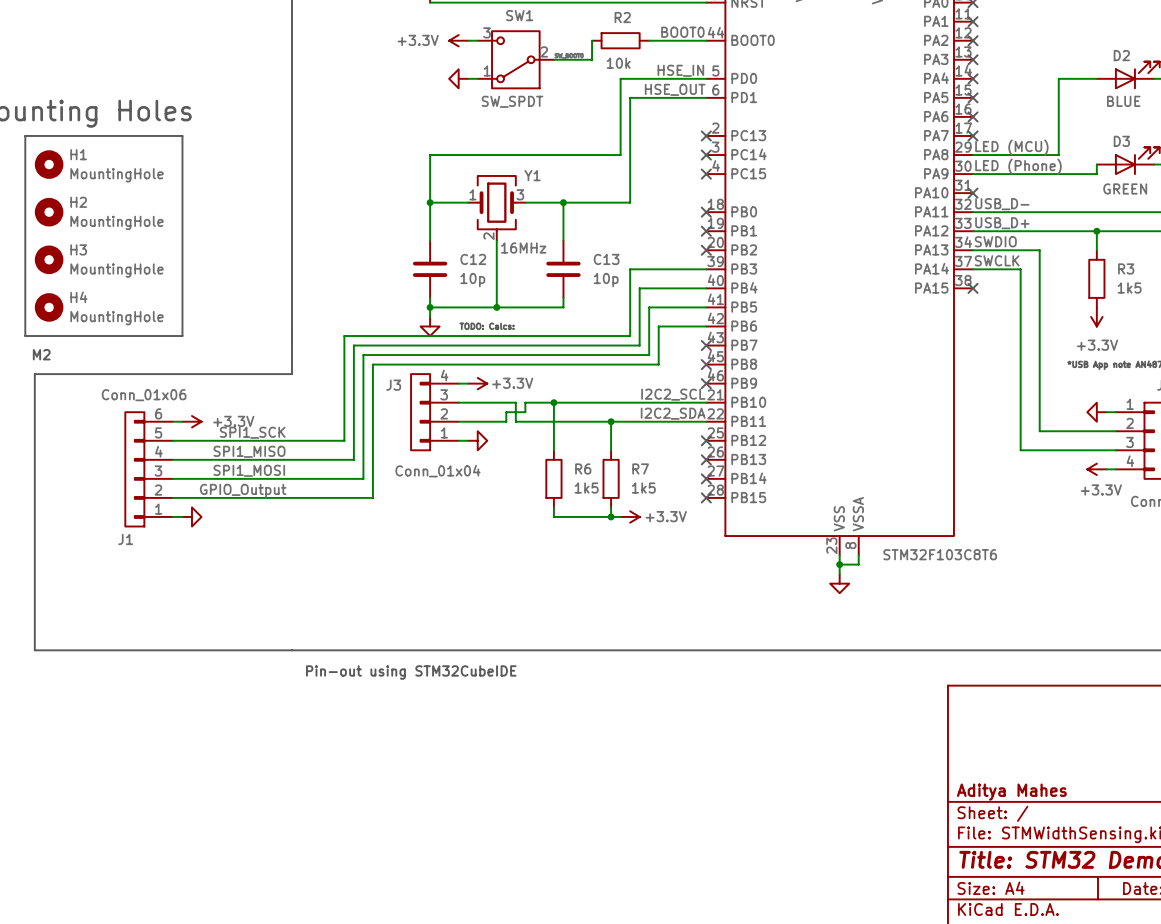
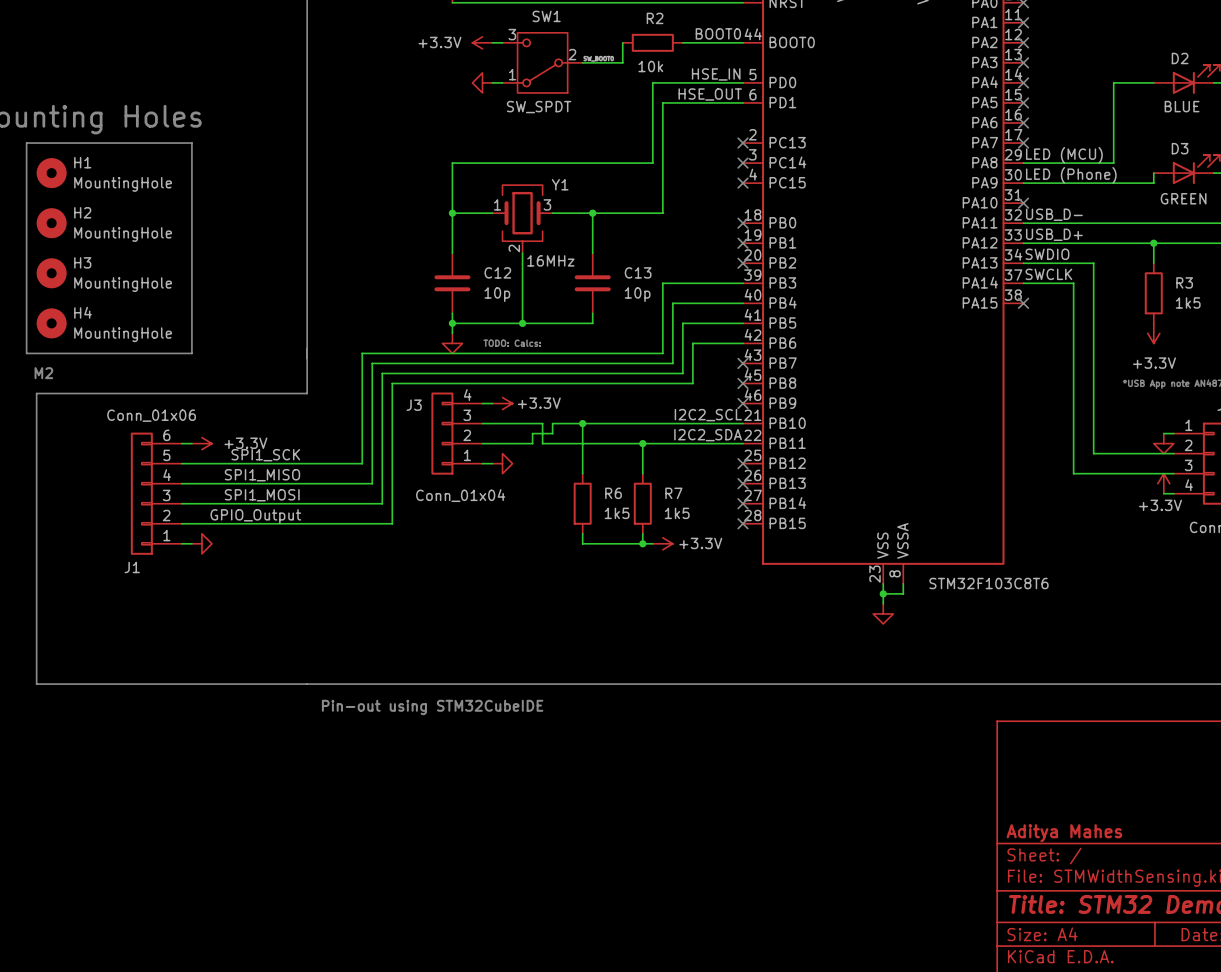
power symbol rotation: 0° (1096, 412) -> 90° counterclockwise (1163, 443)
power symbol position: (1096, 412) -> (1163, 443)
power symbol rotation: 0° (1096, 469) -> 90° clockwise (1163, 483)
power symbol position: +3.3V (1096, 469) -> +3.3V (1163, 483)

